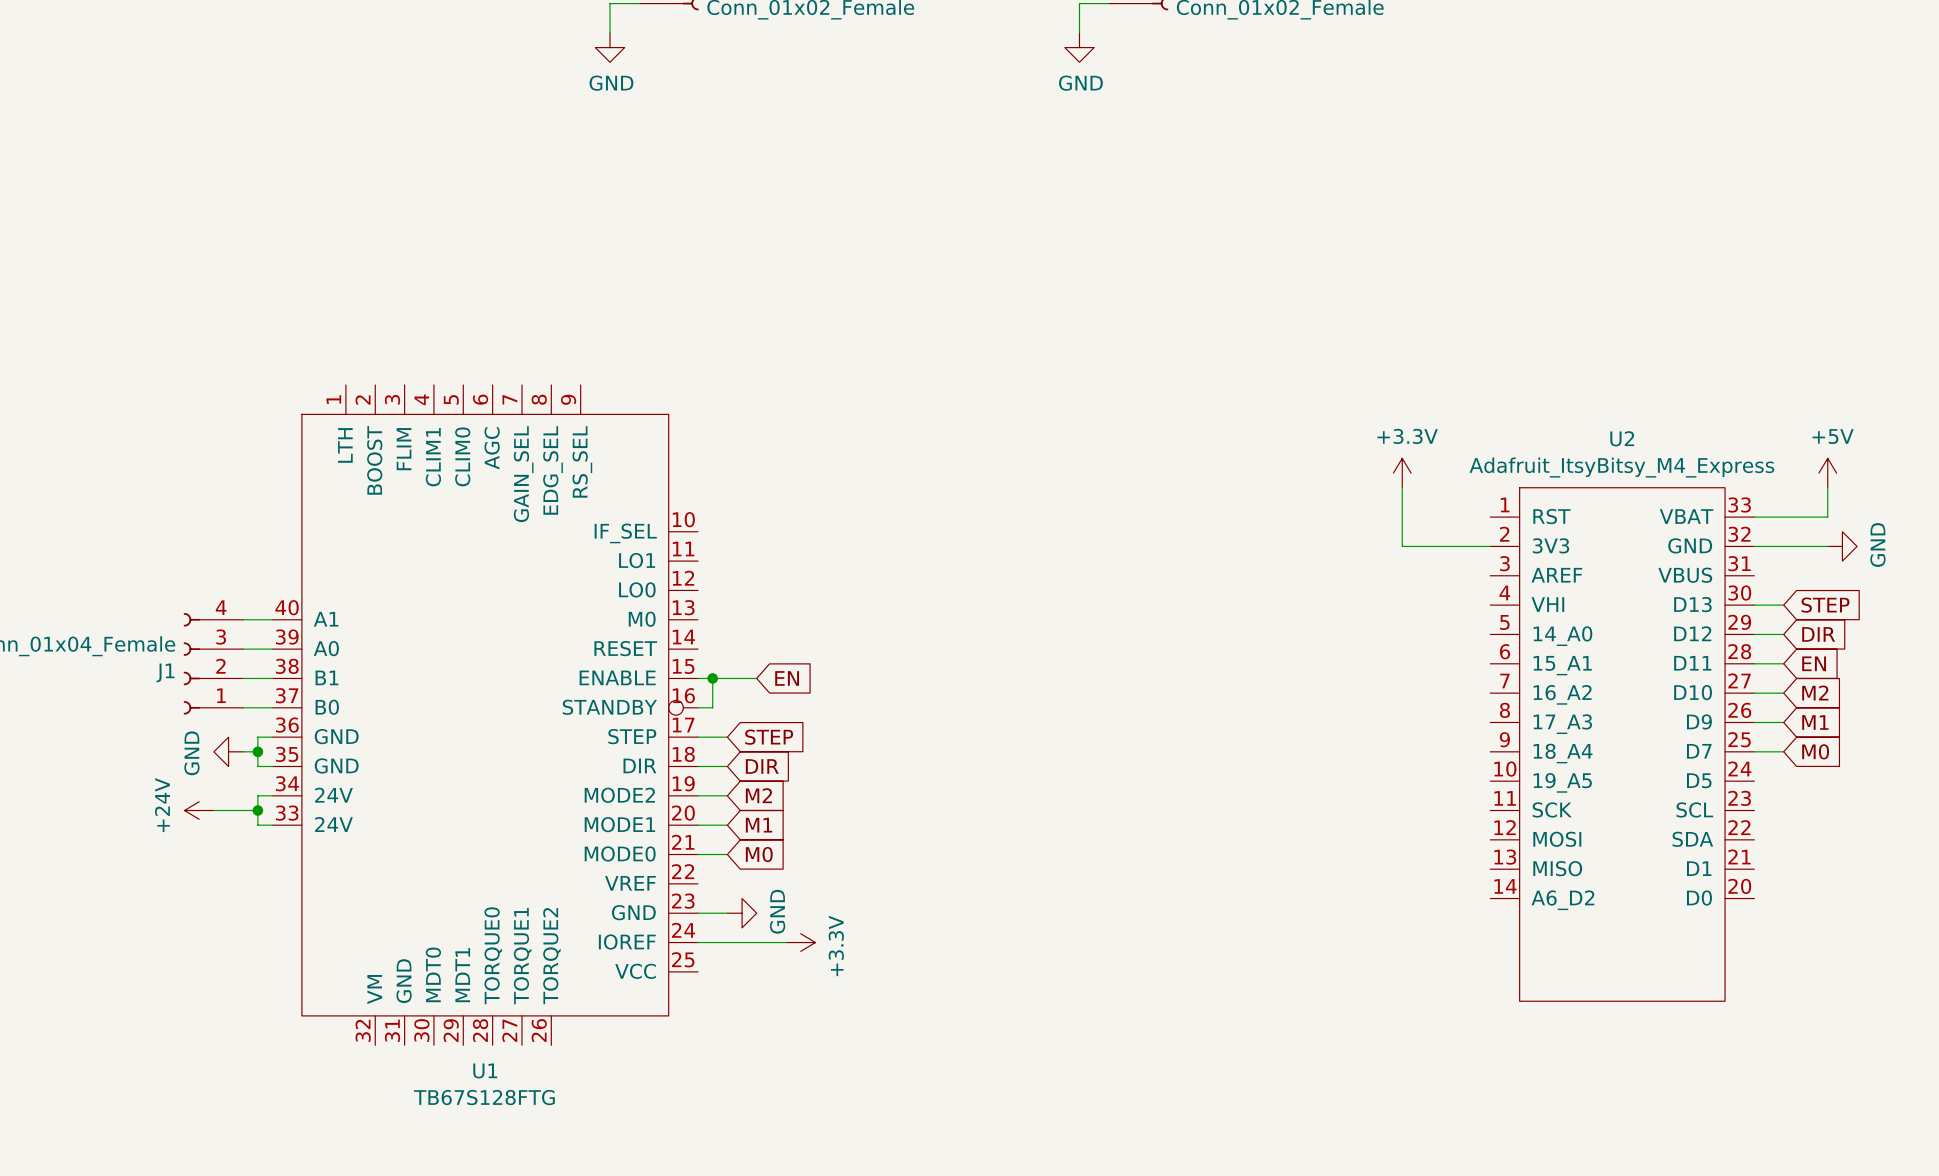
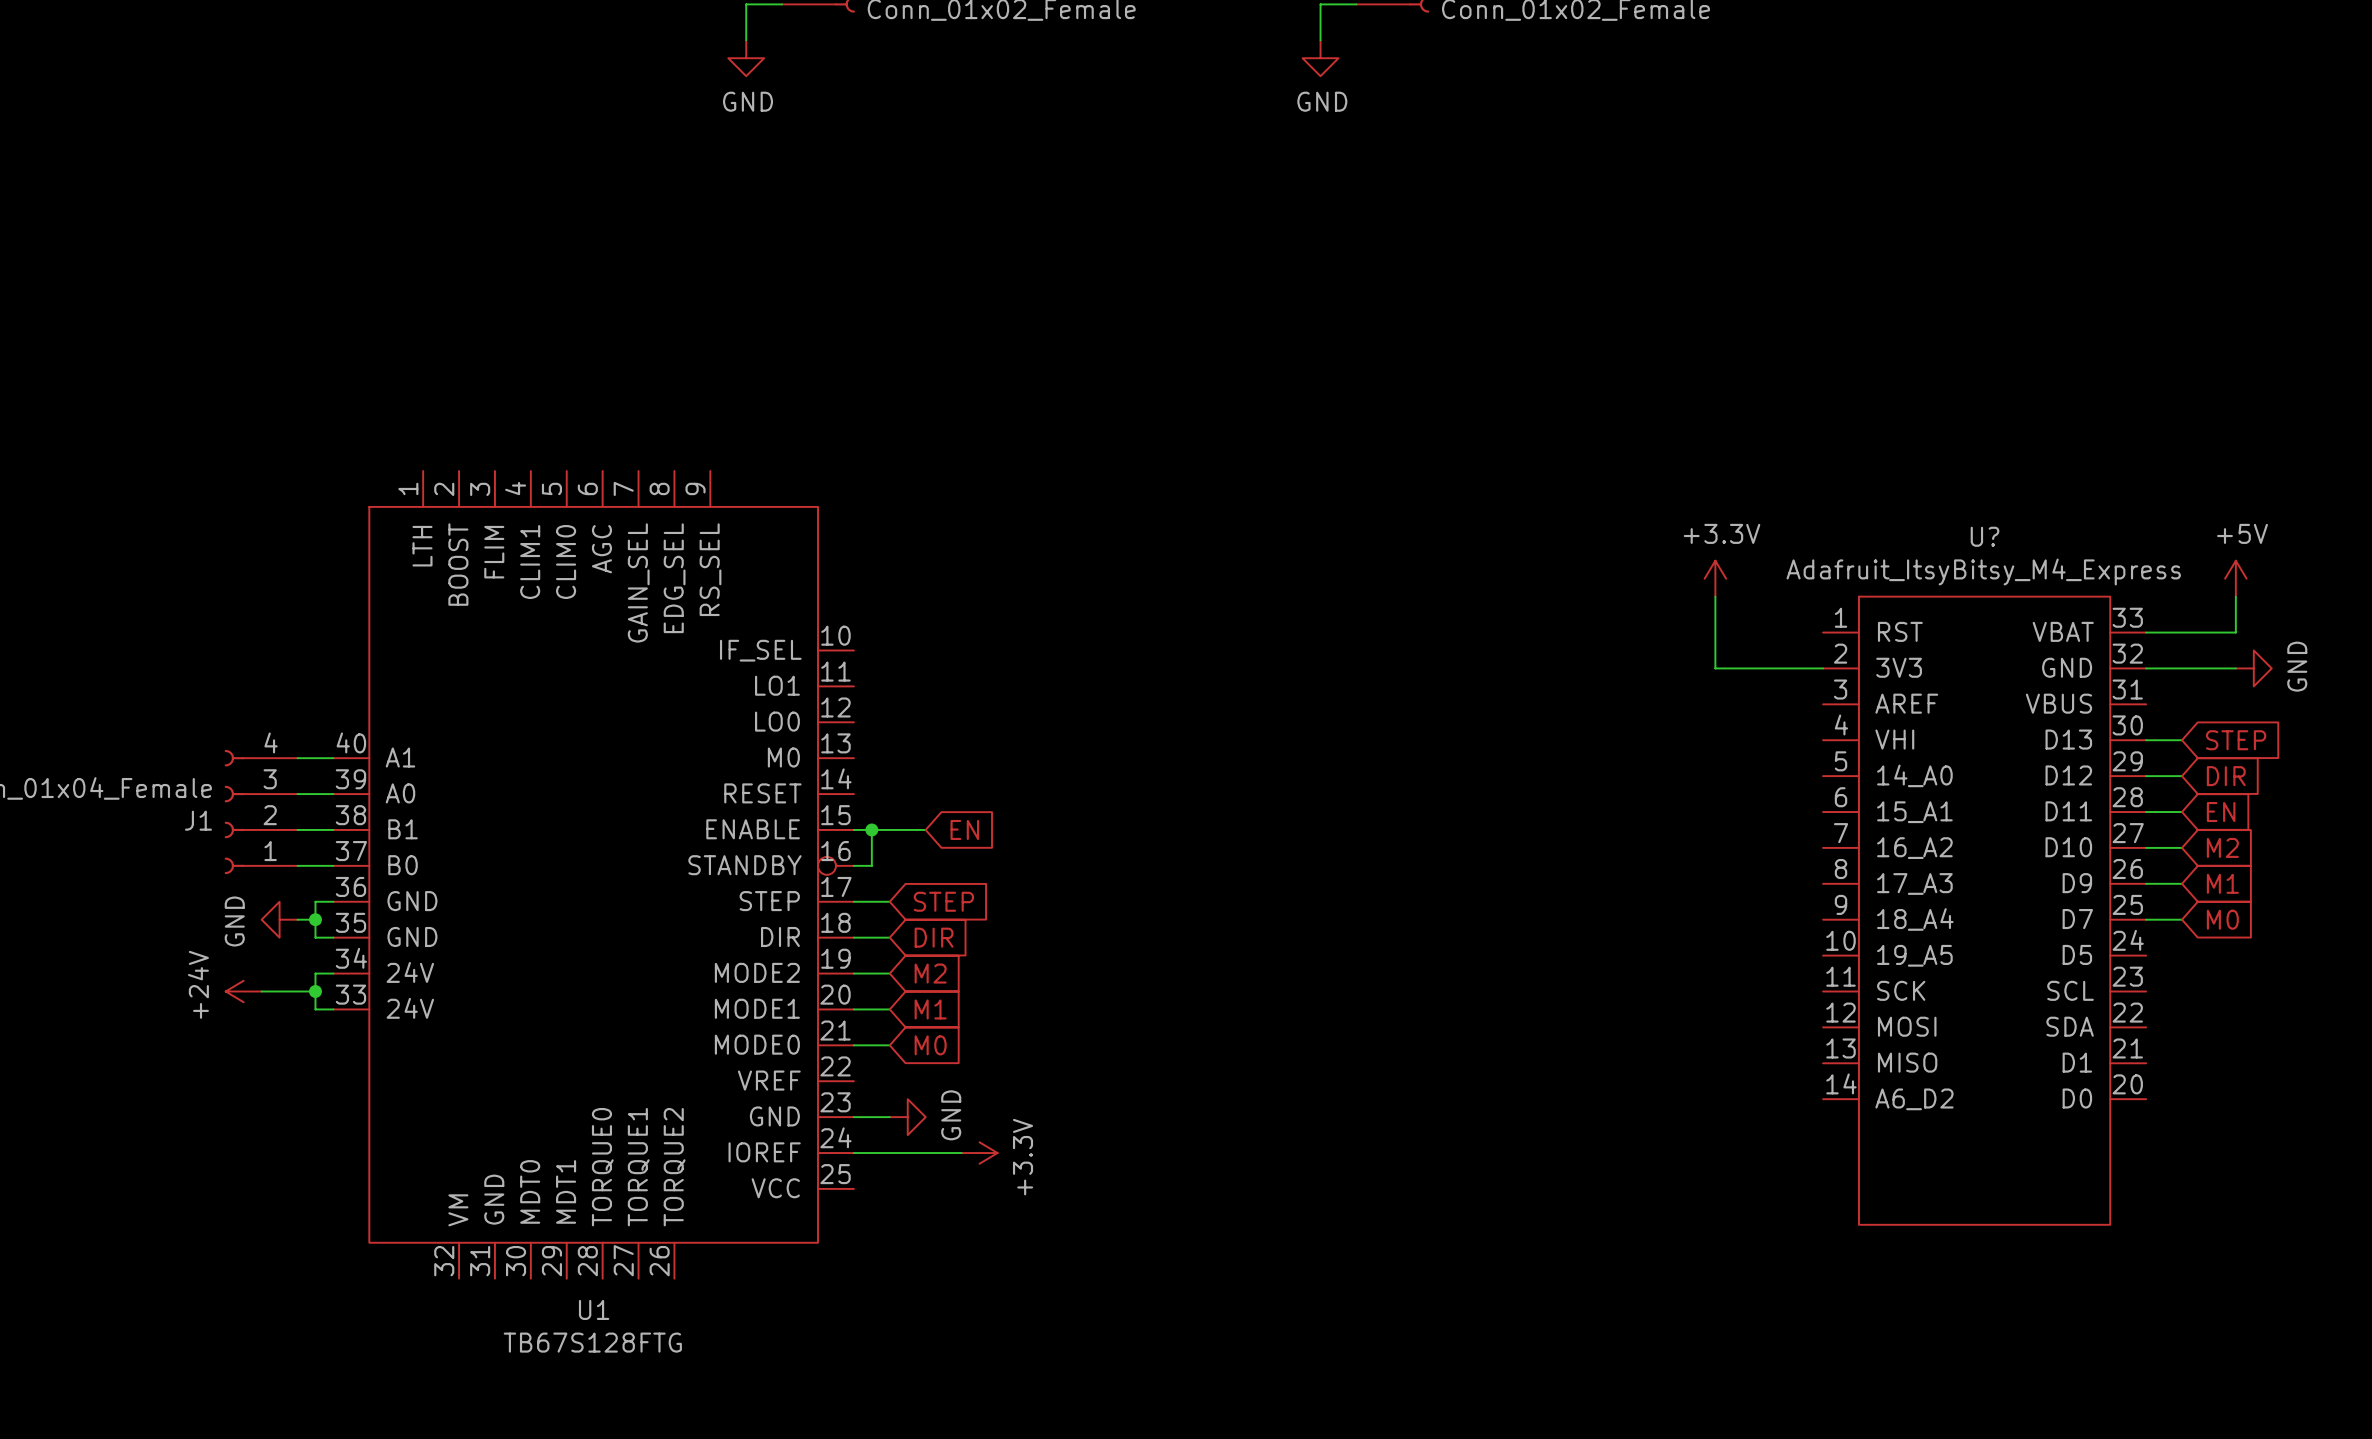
U2 name: U2 (1622, 438) -> U? (1985, 536)

